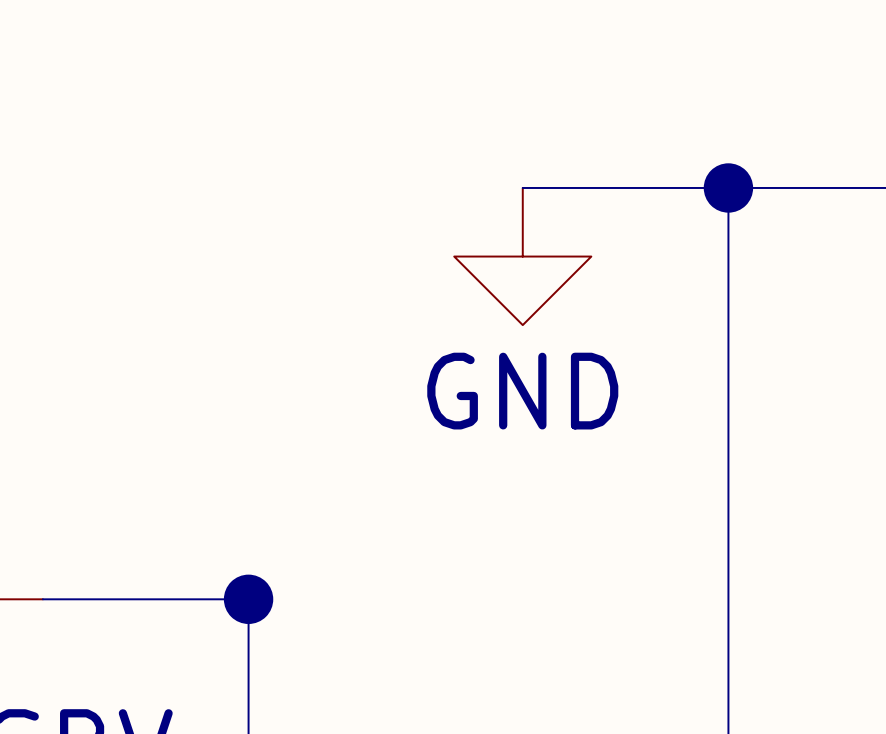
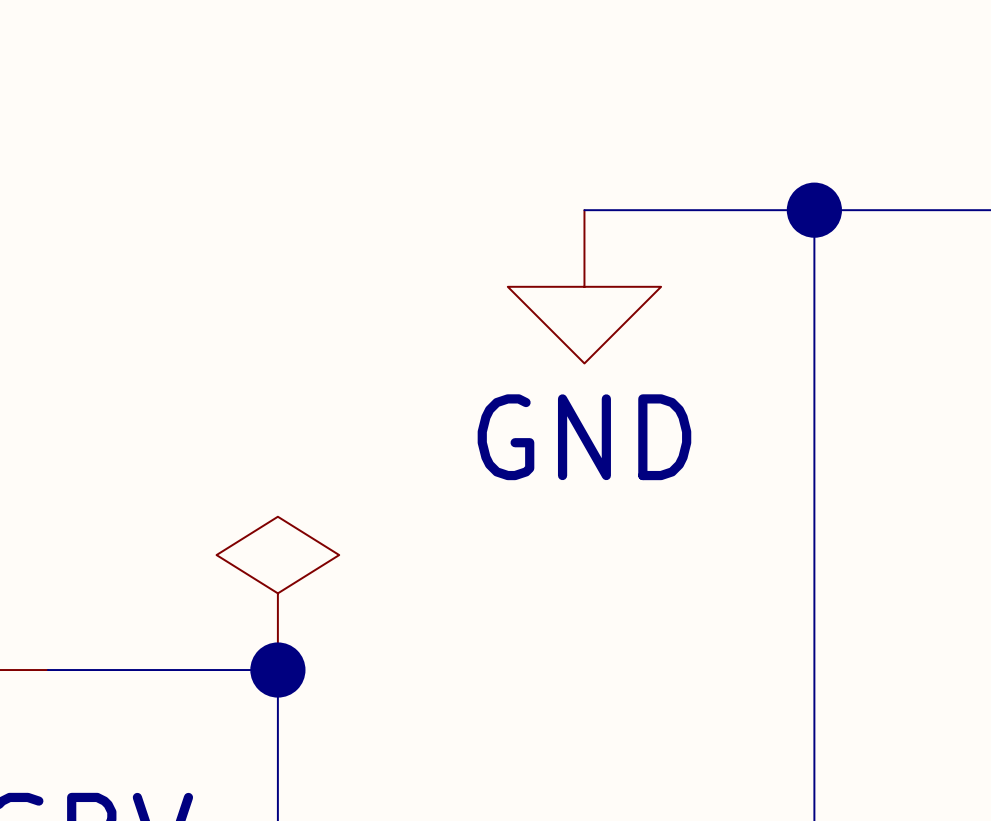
power symbol: none -> (277, 593)

